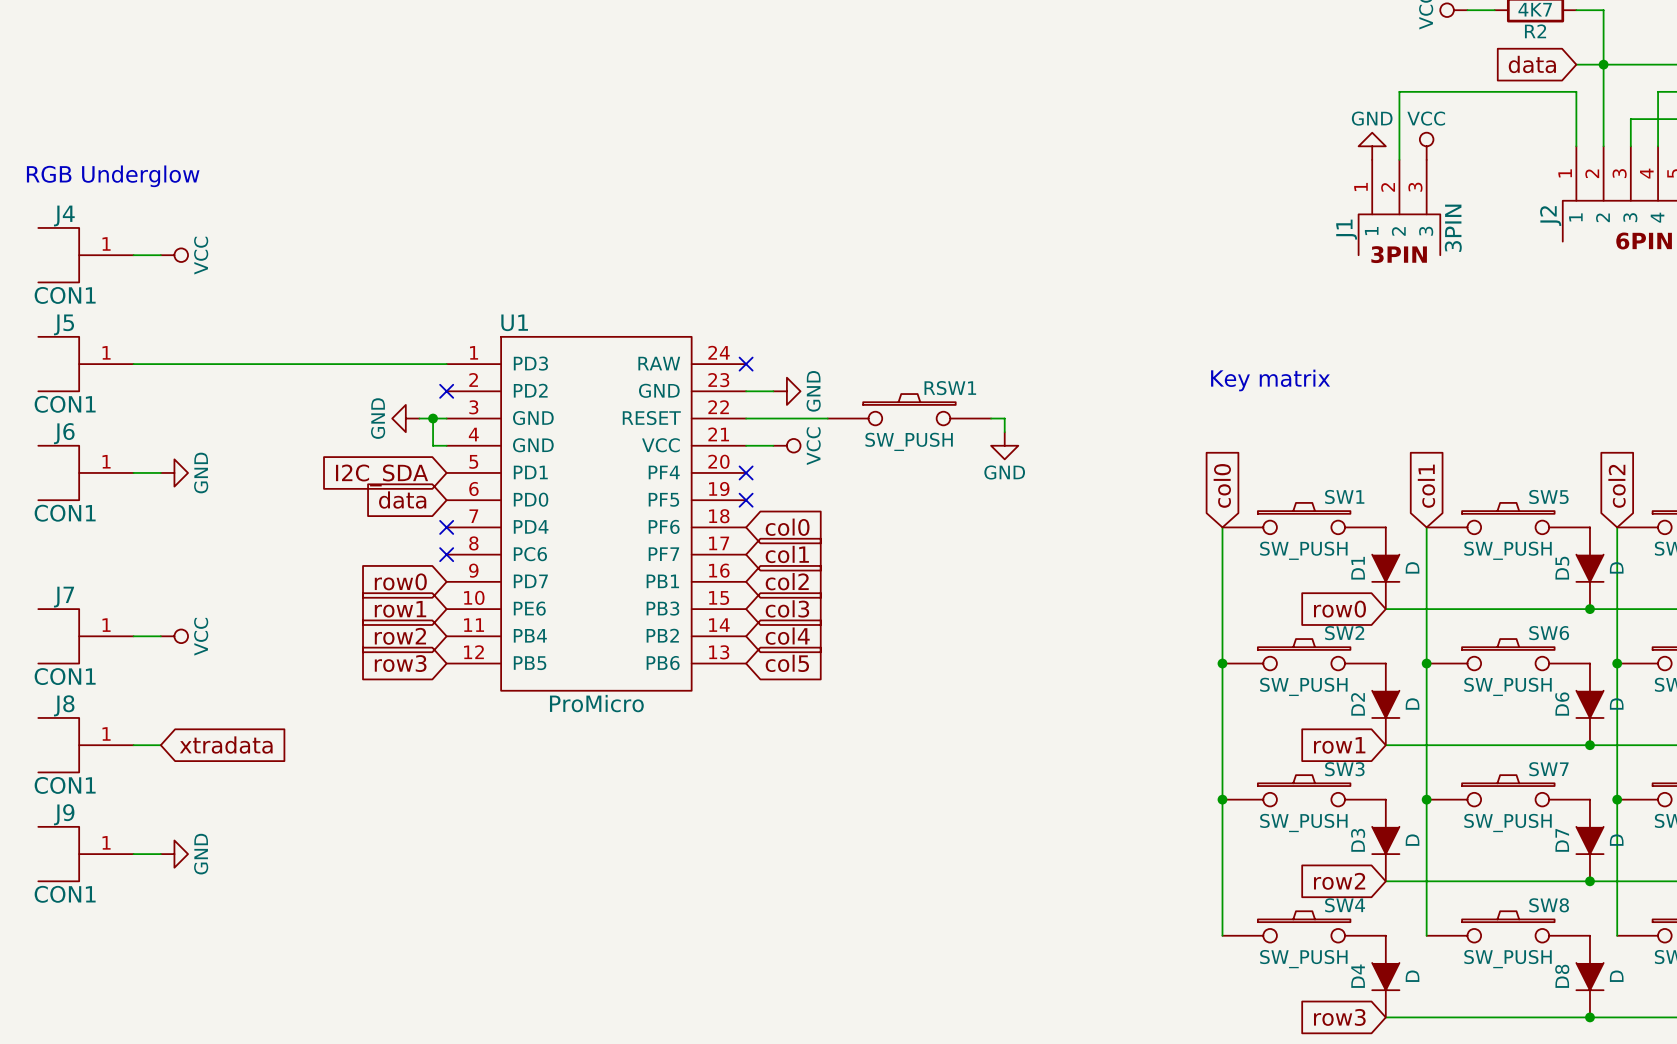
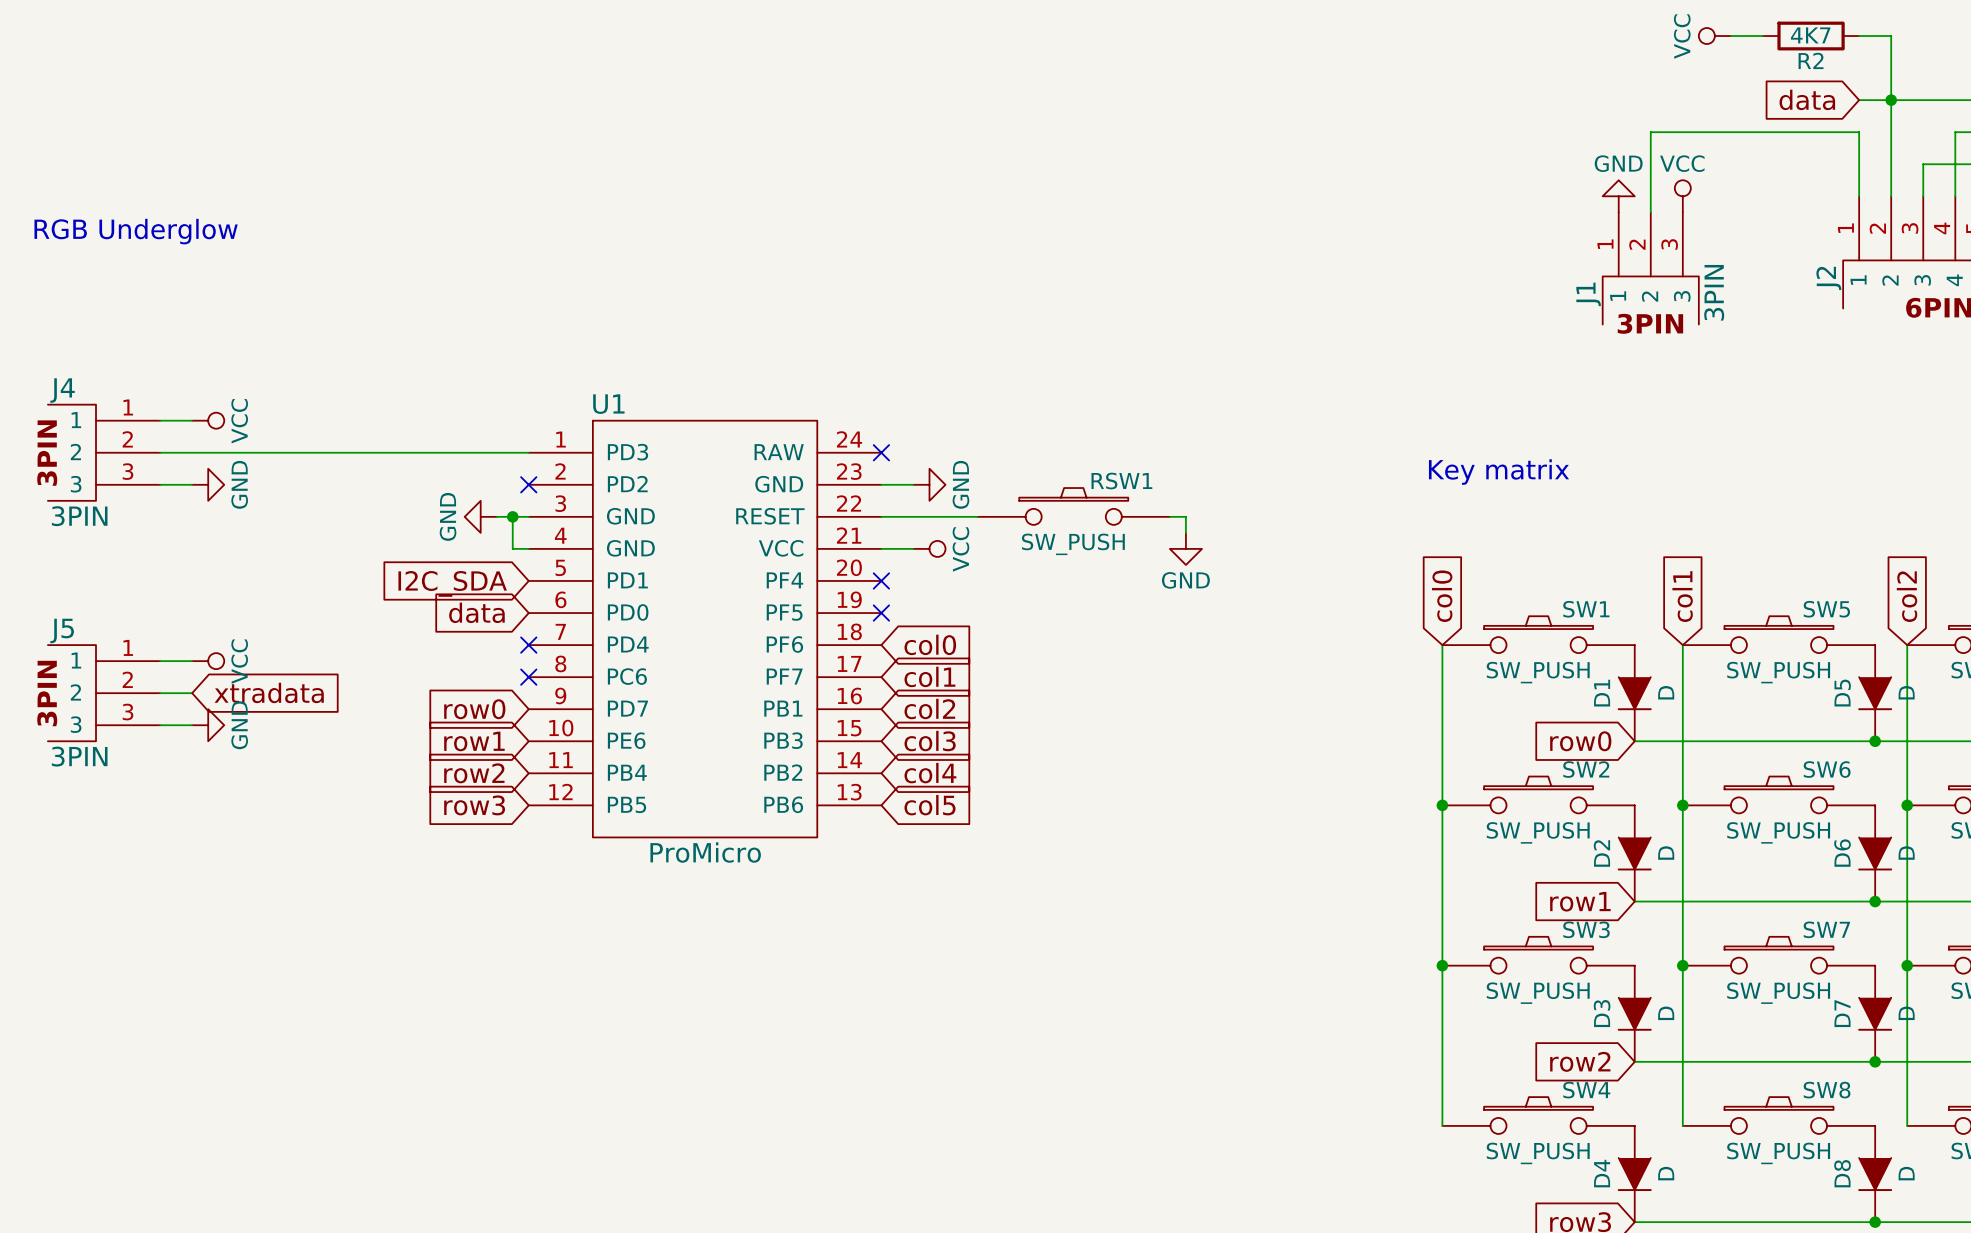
J4 symbol: [38, 227, 134, 283] -> [47, 404, 161, 501]
wire: (133, 255) (160, 255) -> (160, 420) (192, 420)
power symbol position: VCC (174, 255) -> VCC (208, 420)
J4 value: CON1 (65, 295) -> 3PIN (79, 516)
J5 symbol: [38, 336, 134, 392] -> [47, 645, 161, 742]
wire: none -> (160, 484) (192, 484)
power symbol: none -> GND (208, 484)
J5 value: CON1 (65, 404) -> 3PIN (79, 756)
J6: CON1 (85, 472) -> none
wire: (133, 472) (160, 472) -> (160, 661) (192, 661)
power symbol: GND (174, 472) -> none
power symbol: none -> GND (208, 725)
J7: CON1 (85, 636) -> none
wire: (133, 636) (160, 636) -> (160, 725) (192, 725)
power symbol position: VCC (174, 636) -> VCC (208, 661)
J8: CON1 (85, 745) -> none
wire: (133, 745) (160, 745) -> (160, 693) (192, 693)
global label position: xtradata (226, 745) -> xtradata (269, 692)
J9: CON1 (85, 854) -> none
wire: (133, 854) (160, 854) -> none
power symbol: GND (174, 854) -> none

